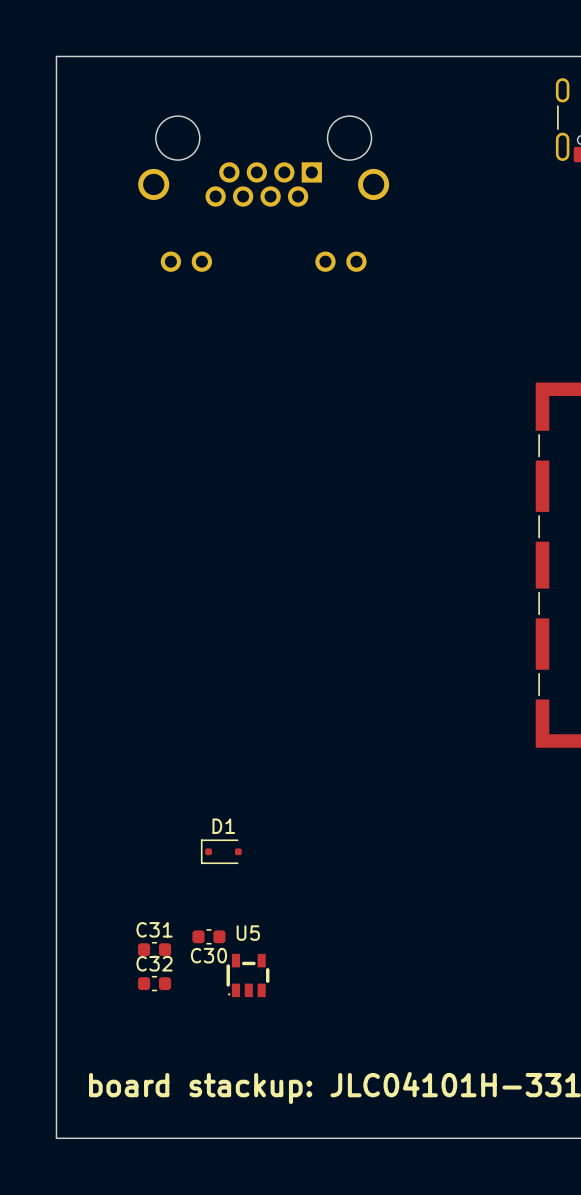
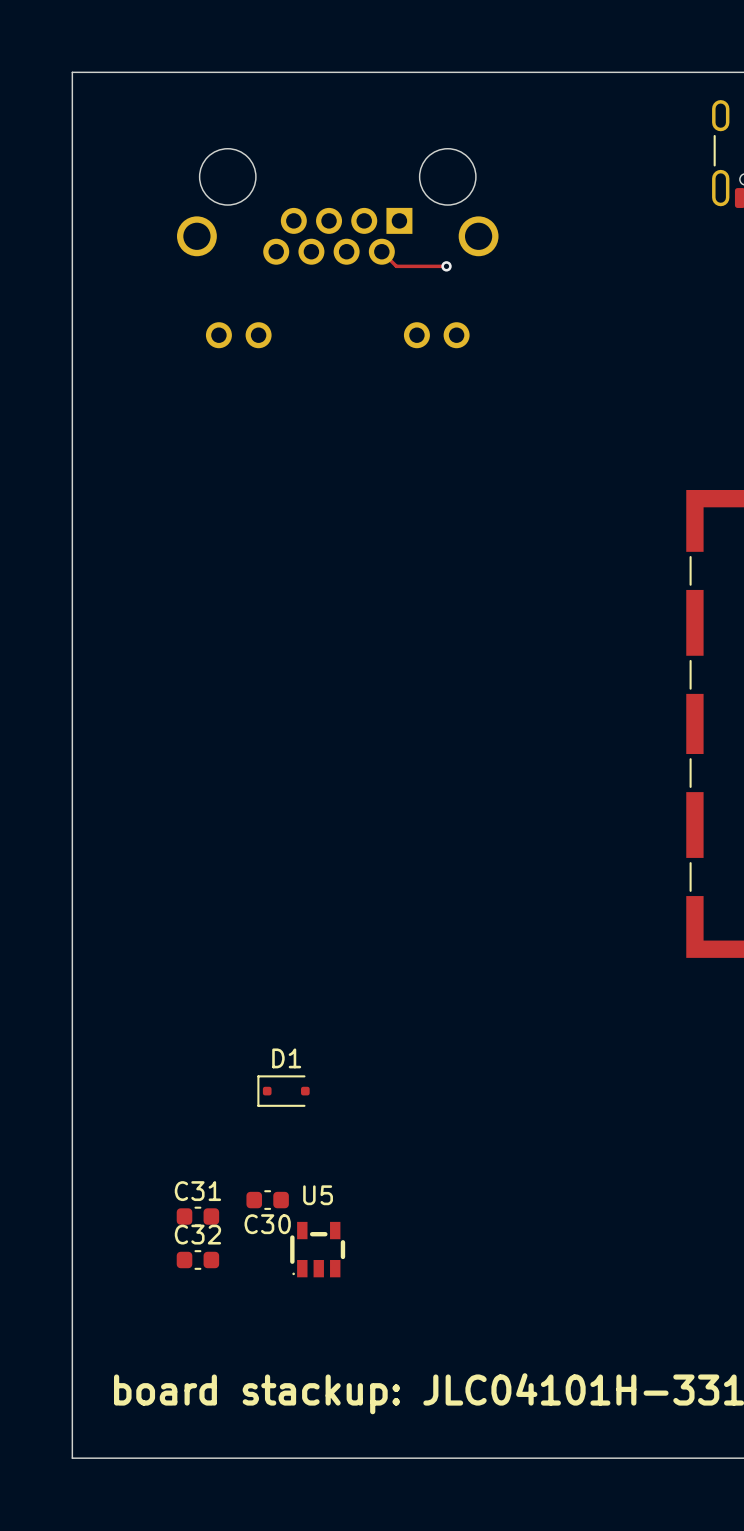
track: none -> (381, 251) (396, 266) (446, 266)
via: none -> (446, 266)

